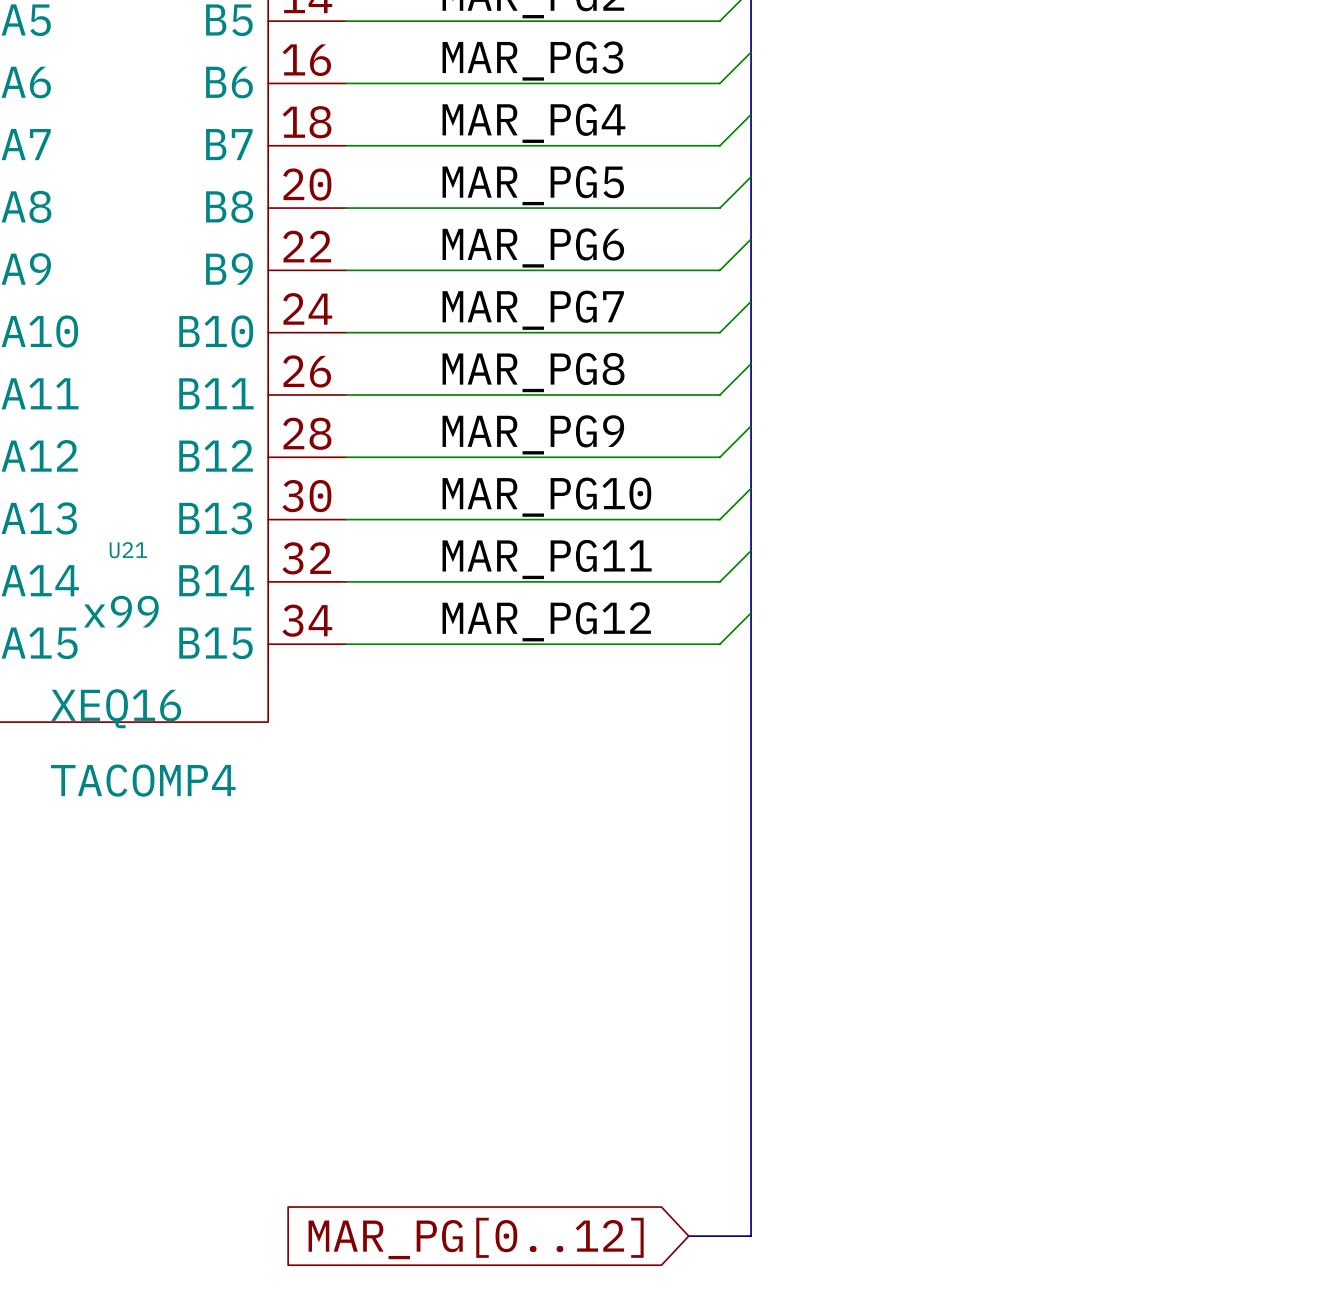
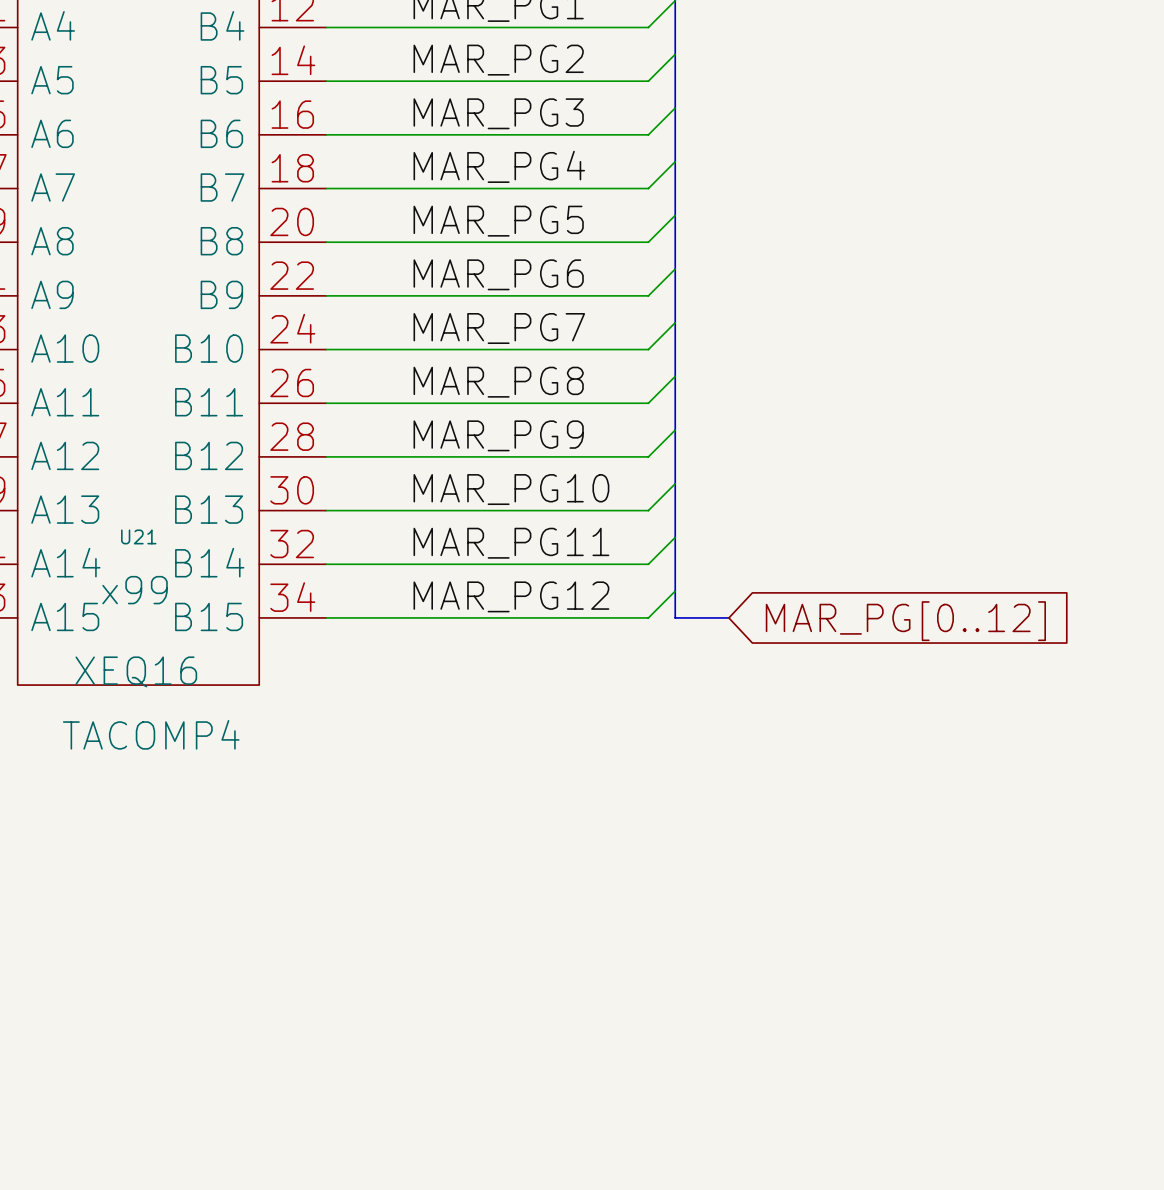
bus: (751, 644) (751, 1236) (688, 1236) -> (675, 617) (728, 617)
global label: none -> MAR_PG[0..12] (905, 621)
global label: MAR_PG[0..12] (476, 1238) -> none

